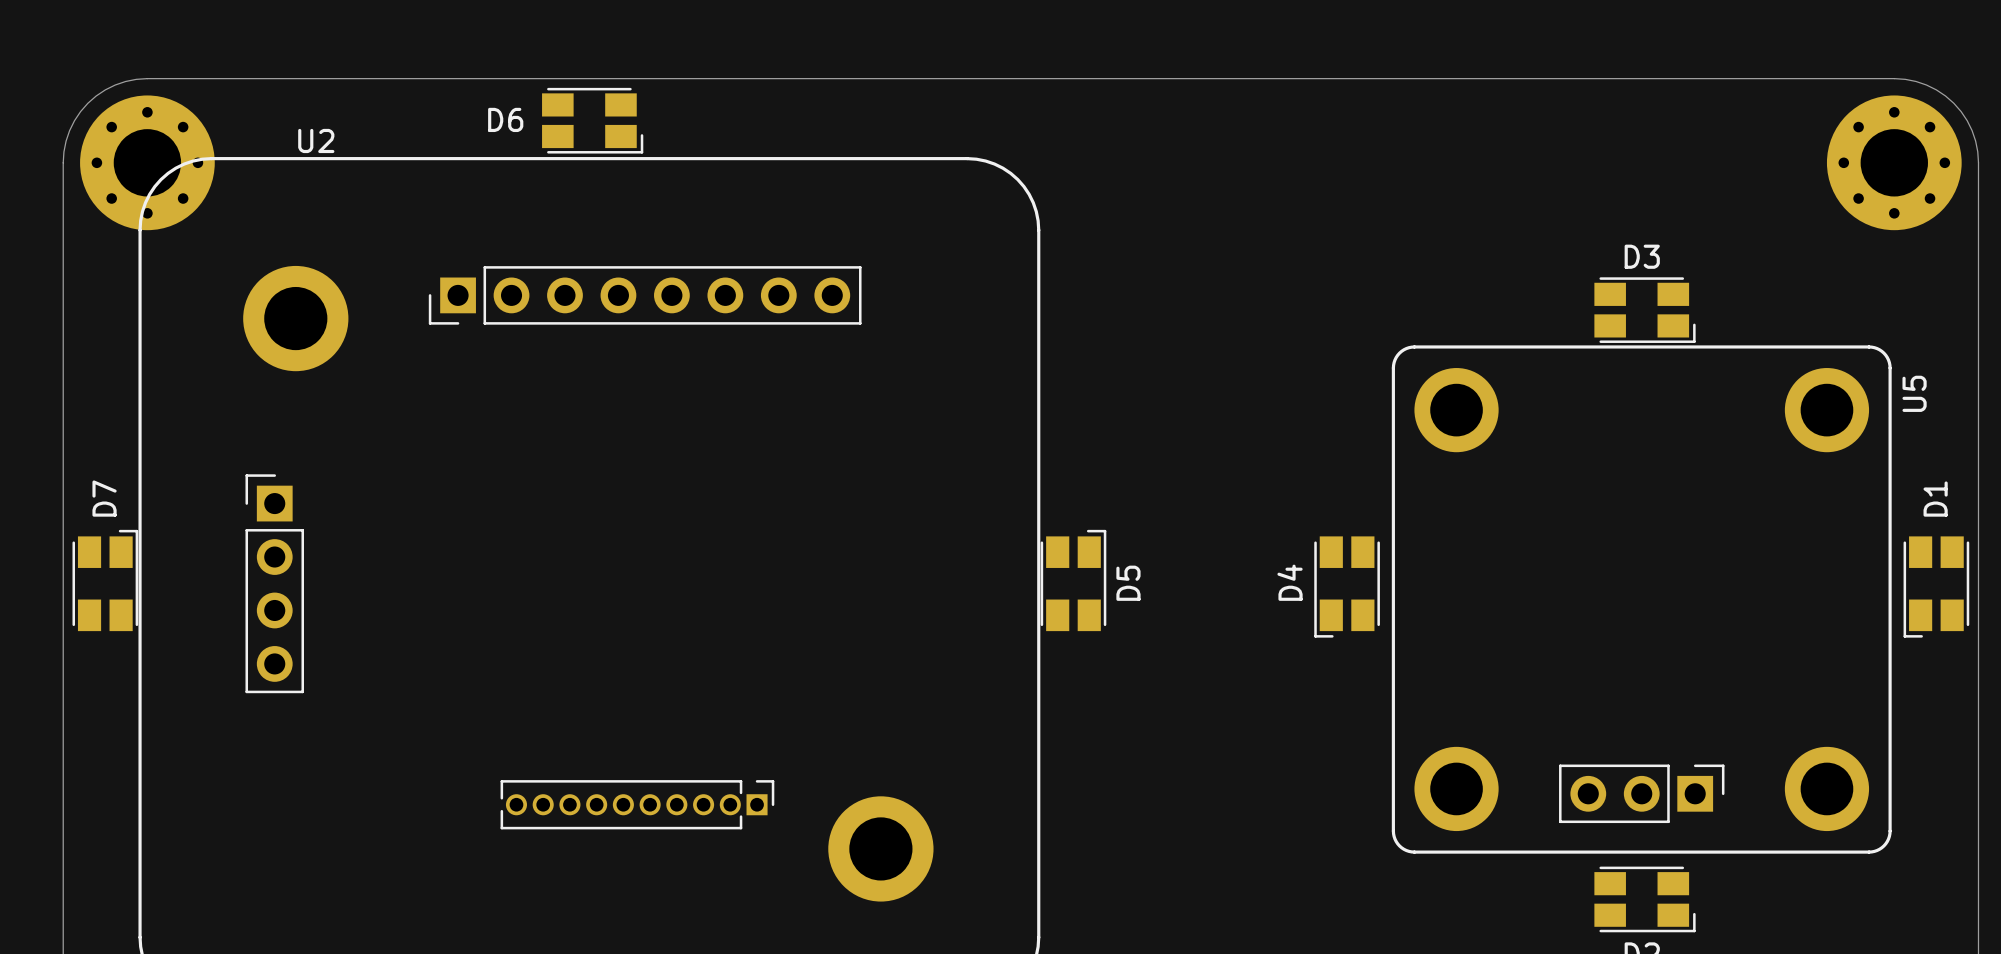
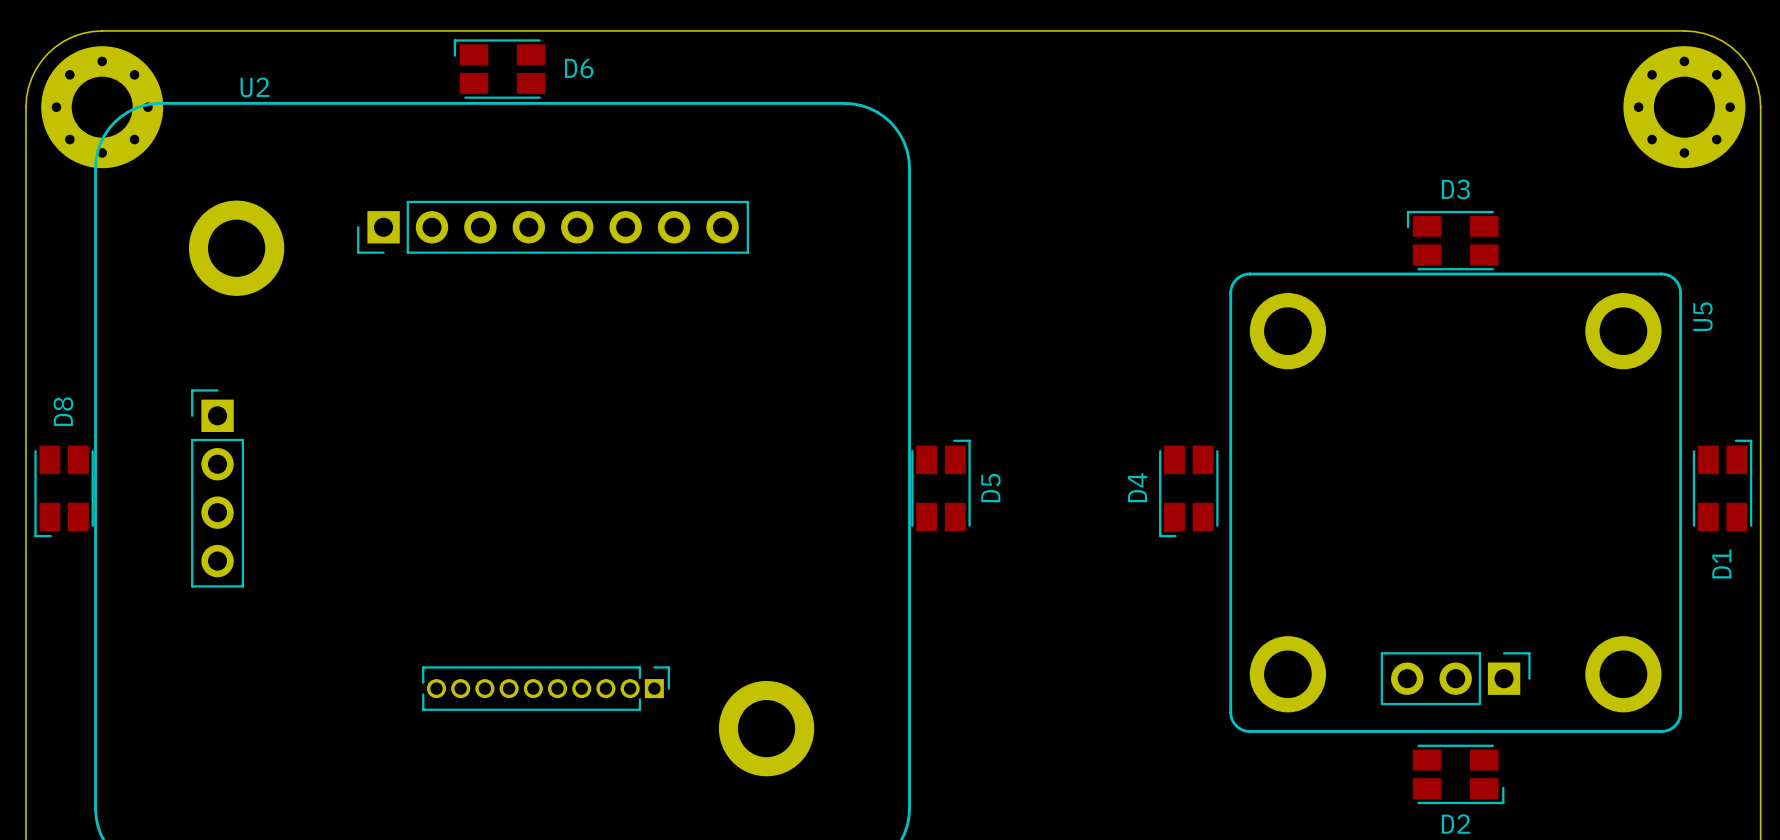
D6 rotation: 0° (592, 120) -> 180° (499, 69)
D3 rotation: 0° (1645, 310) -> 180° (1452, 240)
D7: (105, 580) -> none
D8: none -> (64, 491)
D1 rotation: 0° (1936, 587) -> 180° (1722, 485)

